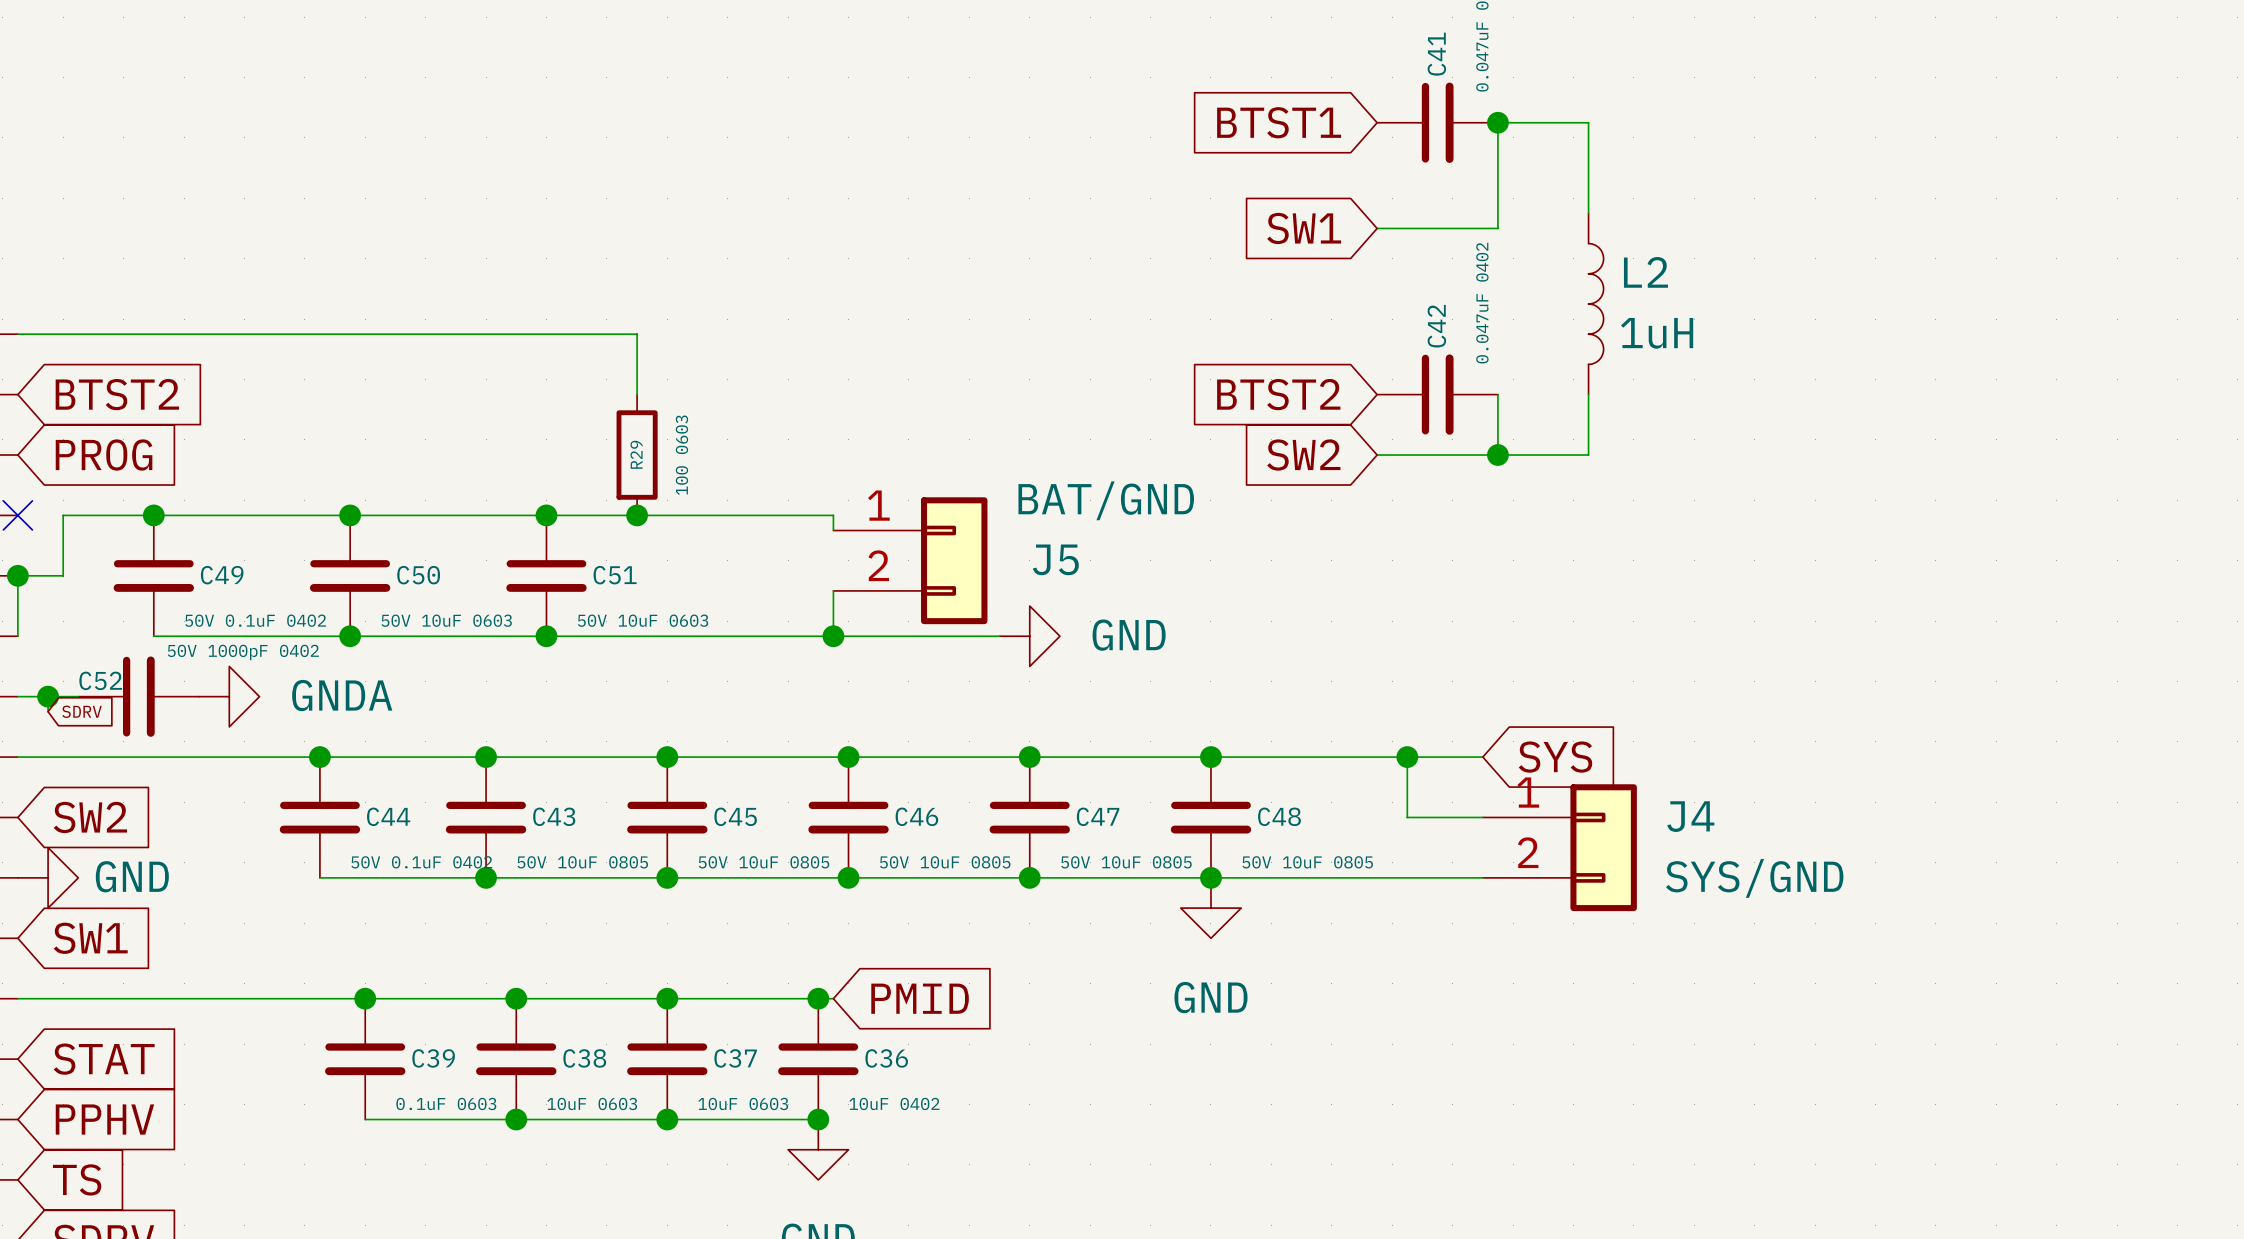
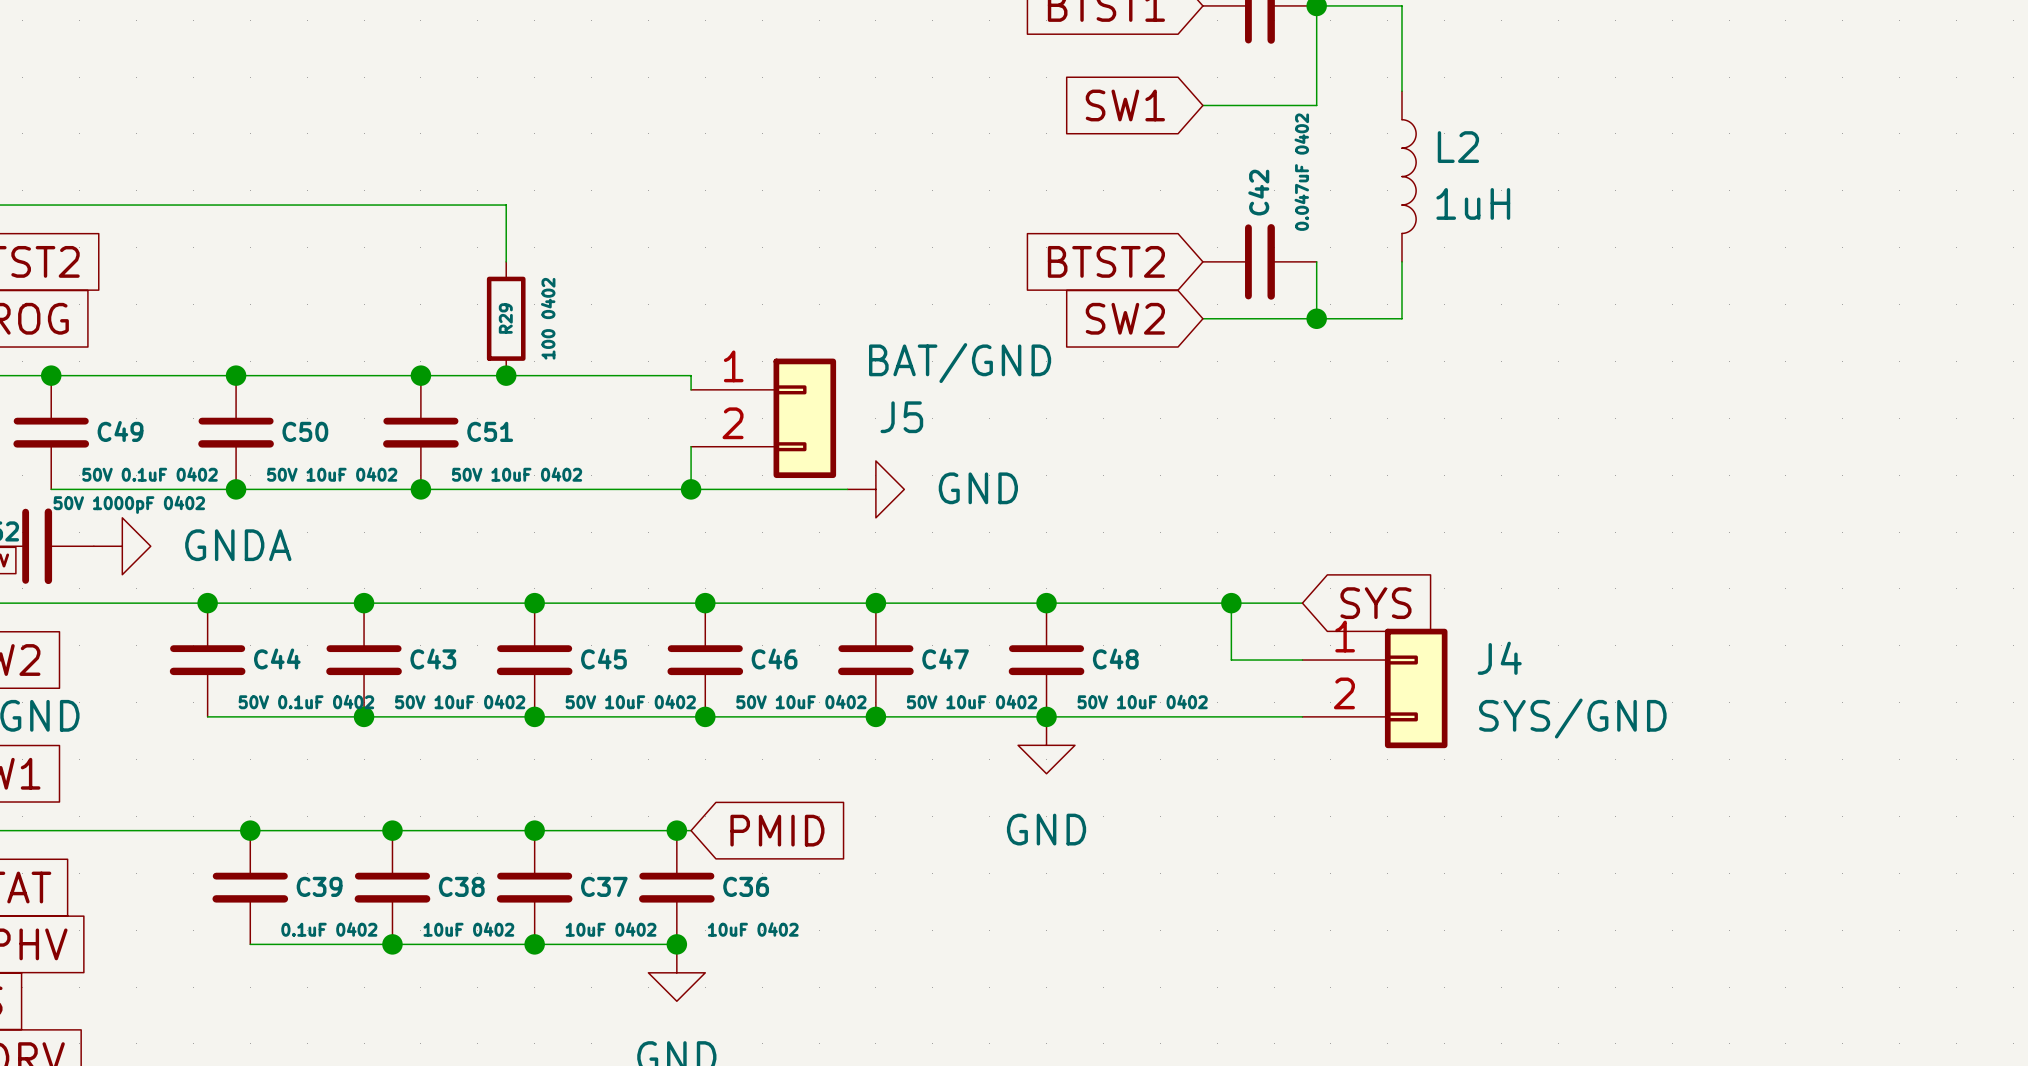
R29 value: 100 0603 (681, 455) -> 100 0402 (548, 318)
C50 value: 50V 10uF 0603 (446, 620) -> 50V 10uF 0402 (332, 474)
C51 value: 50V 10uF 0603 (643, 620) -> 50V 10uF 0402 (517, 474)
C43 value: 50V 10uF 0805 (582, 862) -> 50V 10uF 0402 (460, 701)
C45 value: 50V 10uF 0805 (763, 862) -> 50V 10uF 0402 (630, 701)
C46 value: 50V 10uF 0805 (945, 862) -> 50V 10uF 0402 (801, 701)
C47 value: 50V 10uF 0805 (1126, 862) -> 50V 10uF 0402 (972, 701)
C48 value: 50V 10uF 0805 (1307, 862) -> 50V 10uF 0402 (1142, 701)
C39 value: 0.1uF 0603 (446, 1103) -> 0.1uF 0402 (329, 929)
C38 value: 10uF 0603 (592, 1103) -> 10uF 0402 (468, 929)
C37 value: 10uF 0603 (743, 1103) -> 10uF 0402 (611, 929)

